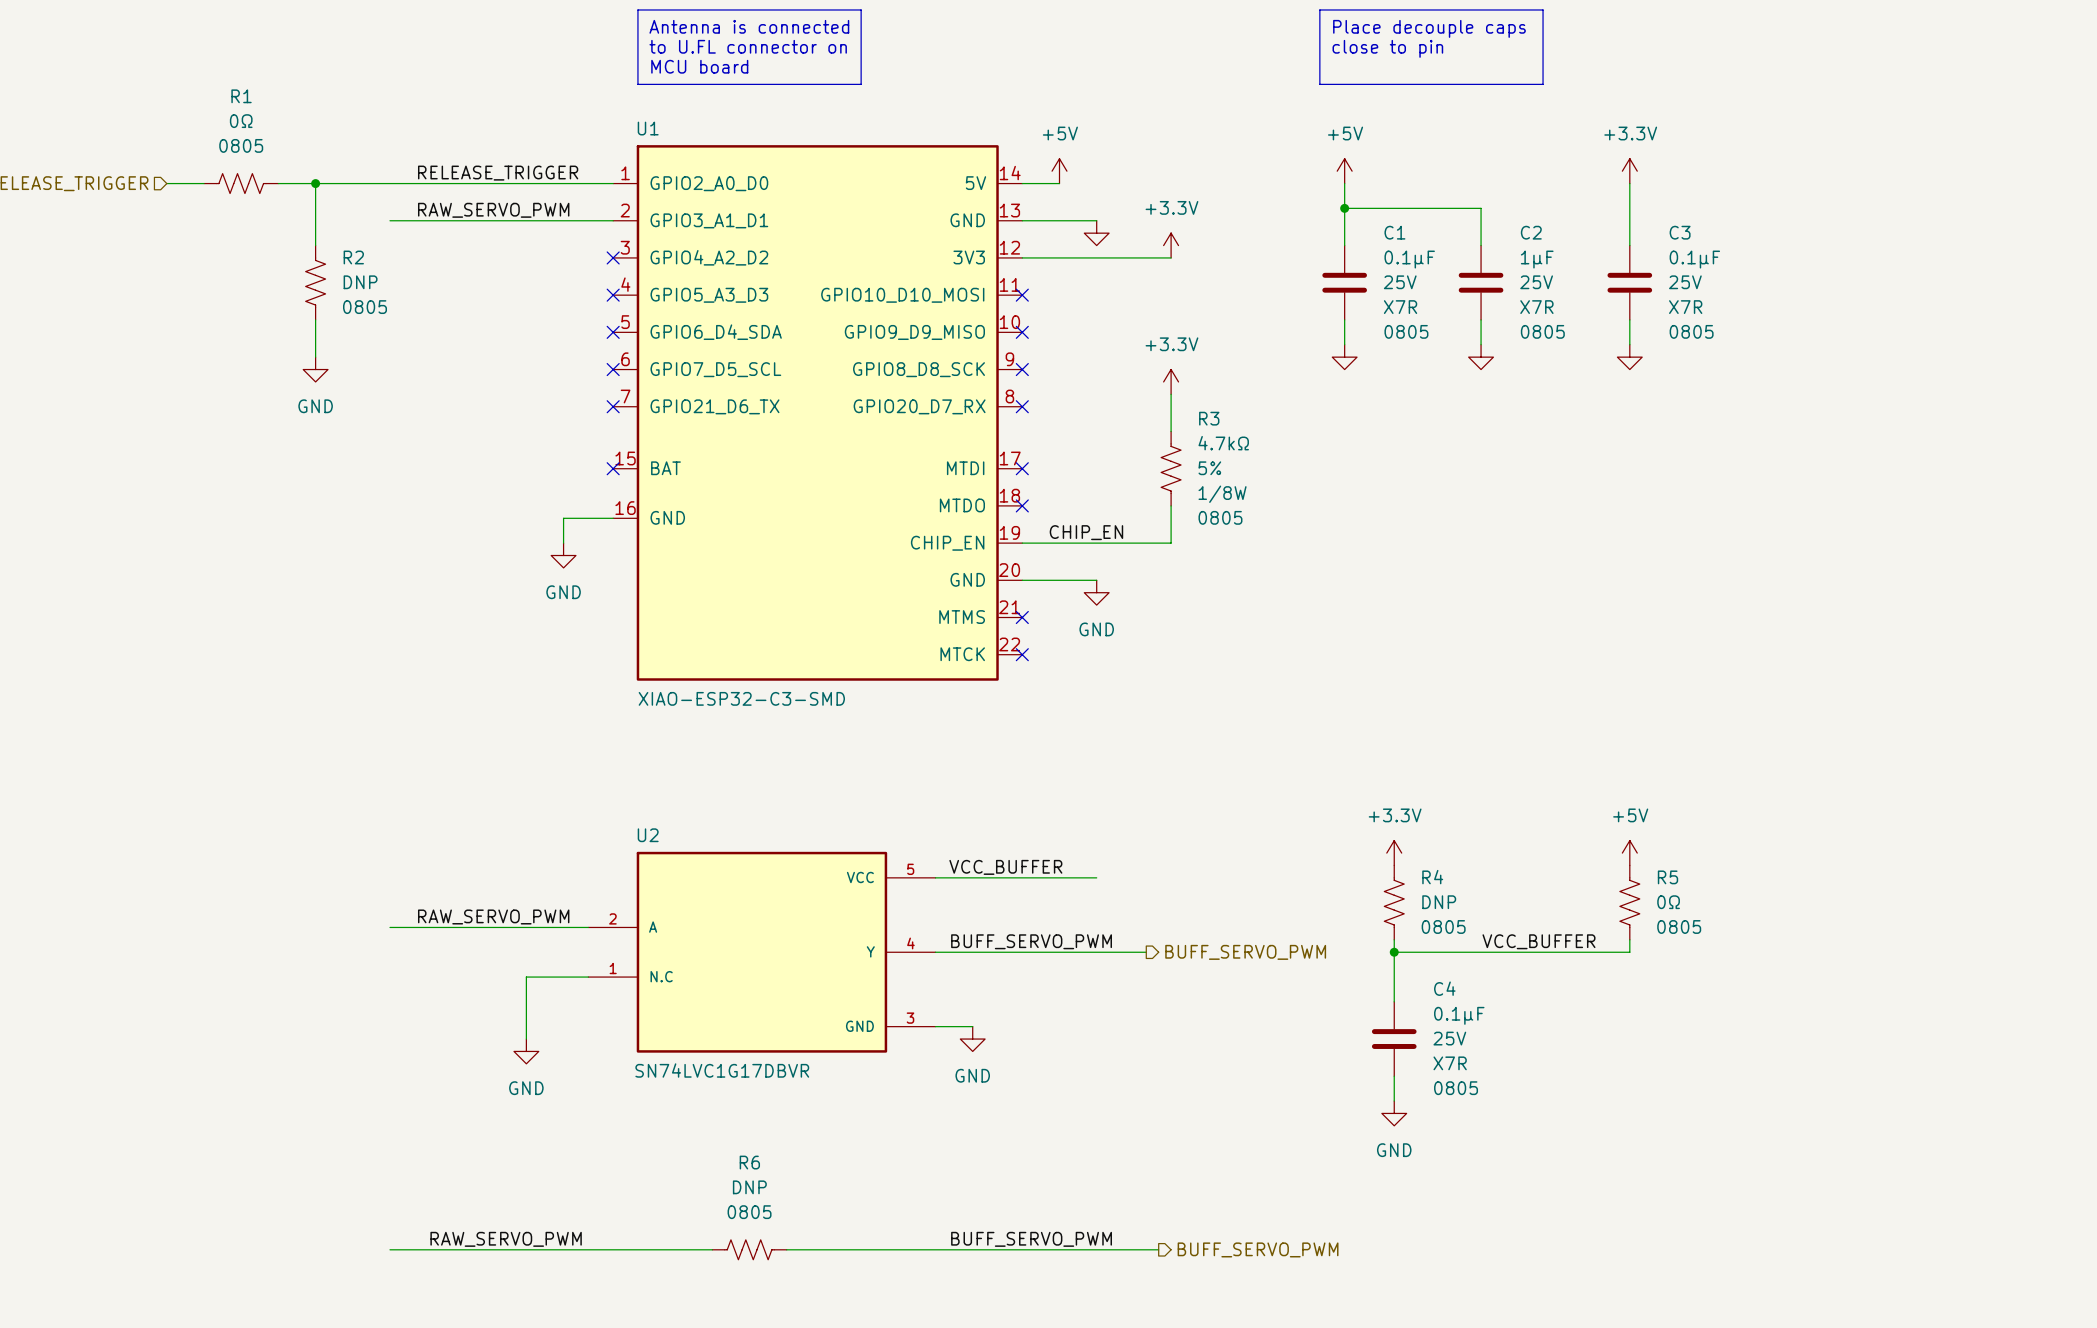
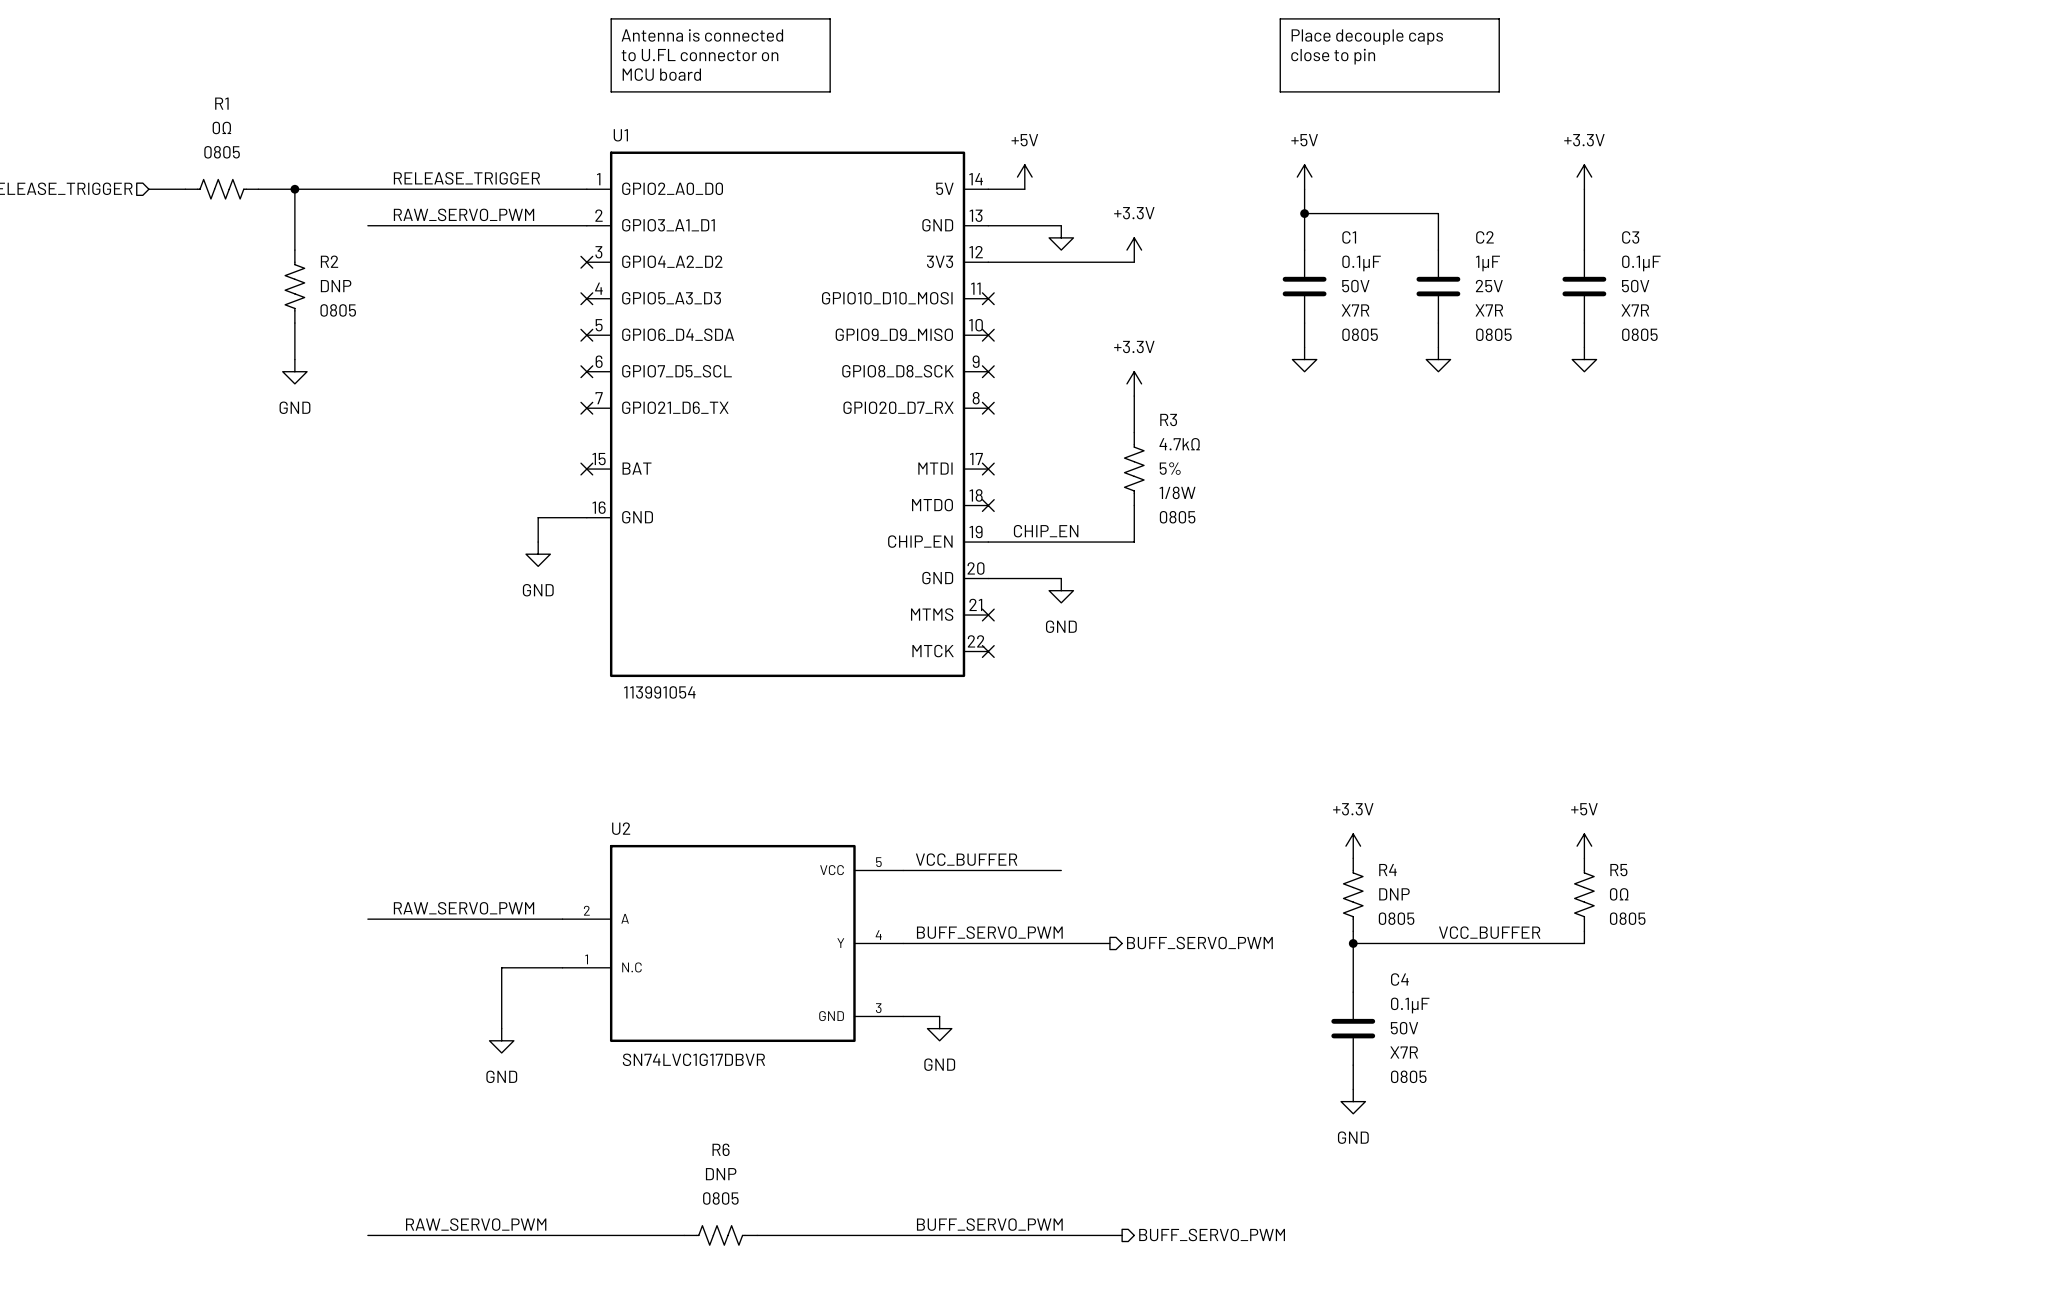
C1 text: 25V (1400, 282) -> 50V (1355, 286)
C3 text: 25V (1685, 282) -> 50V (1635, 286)
U1 value: XIAO-ESP32-C3-SMD (741, 698) -> 113991054 (659, 692)
C4 text: 25V (1449, 1038) -> 50V (1404, 1028)

